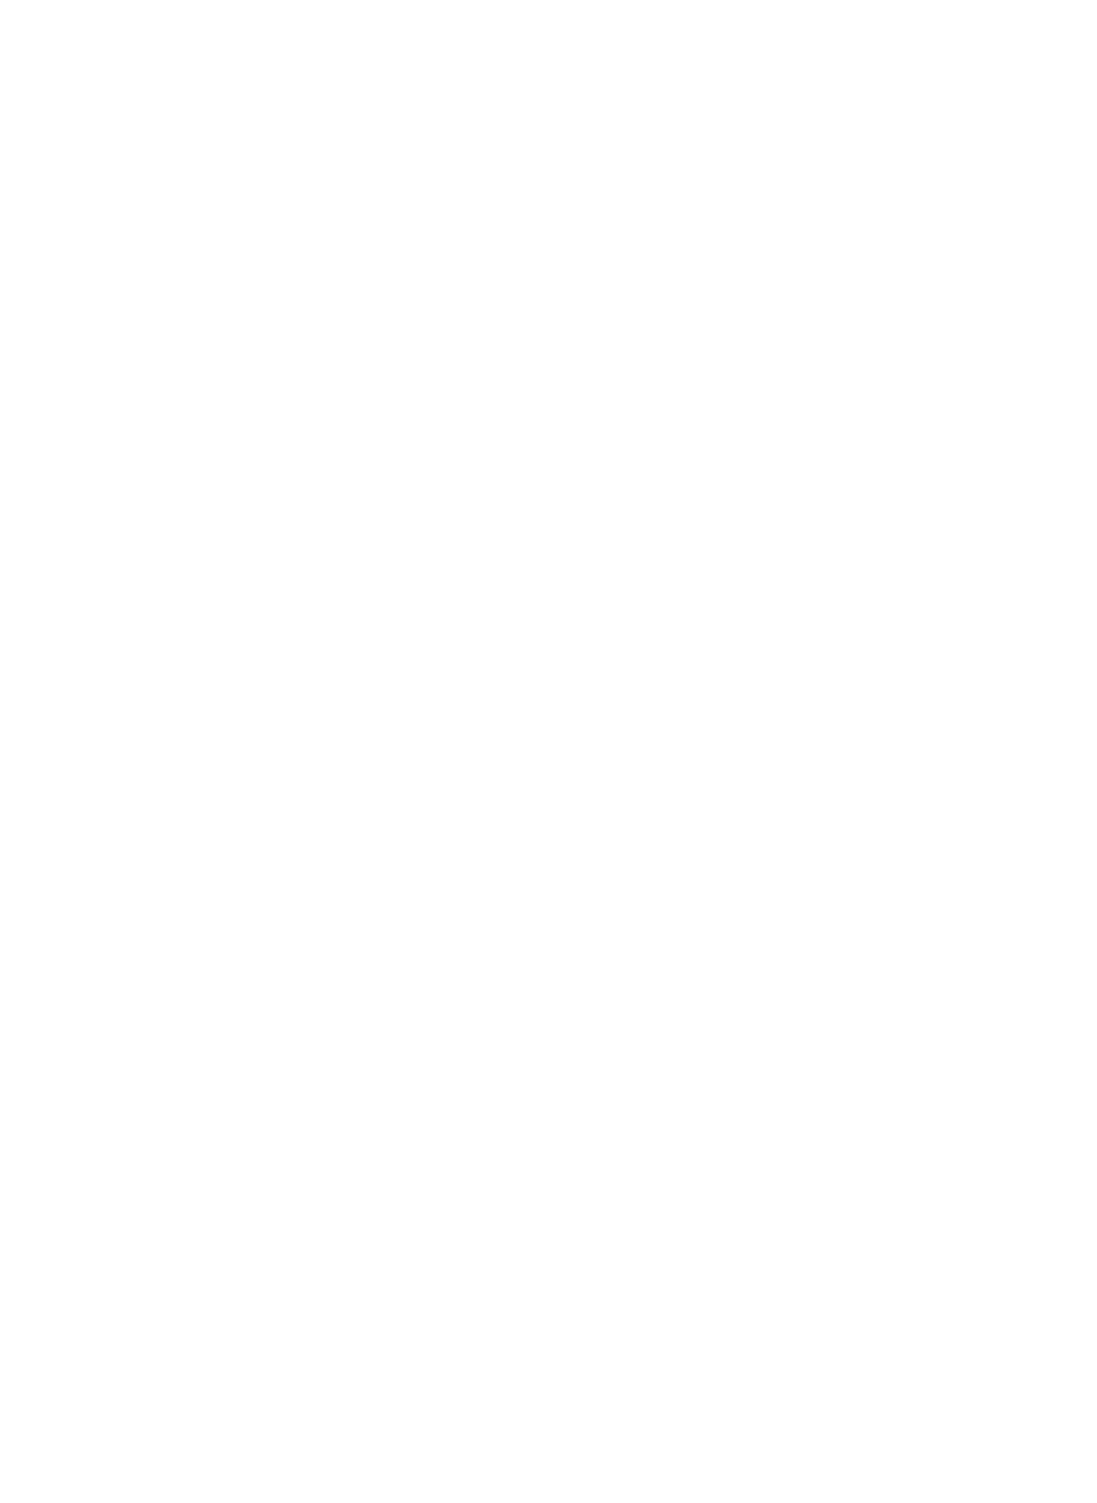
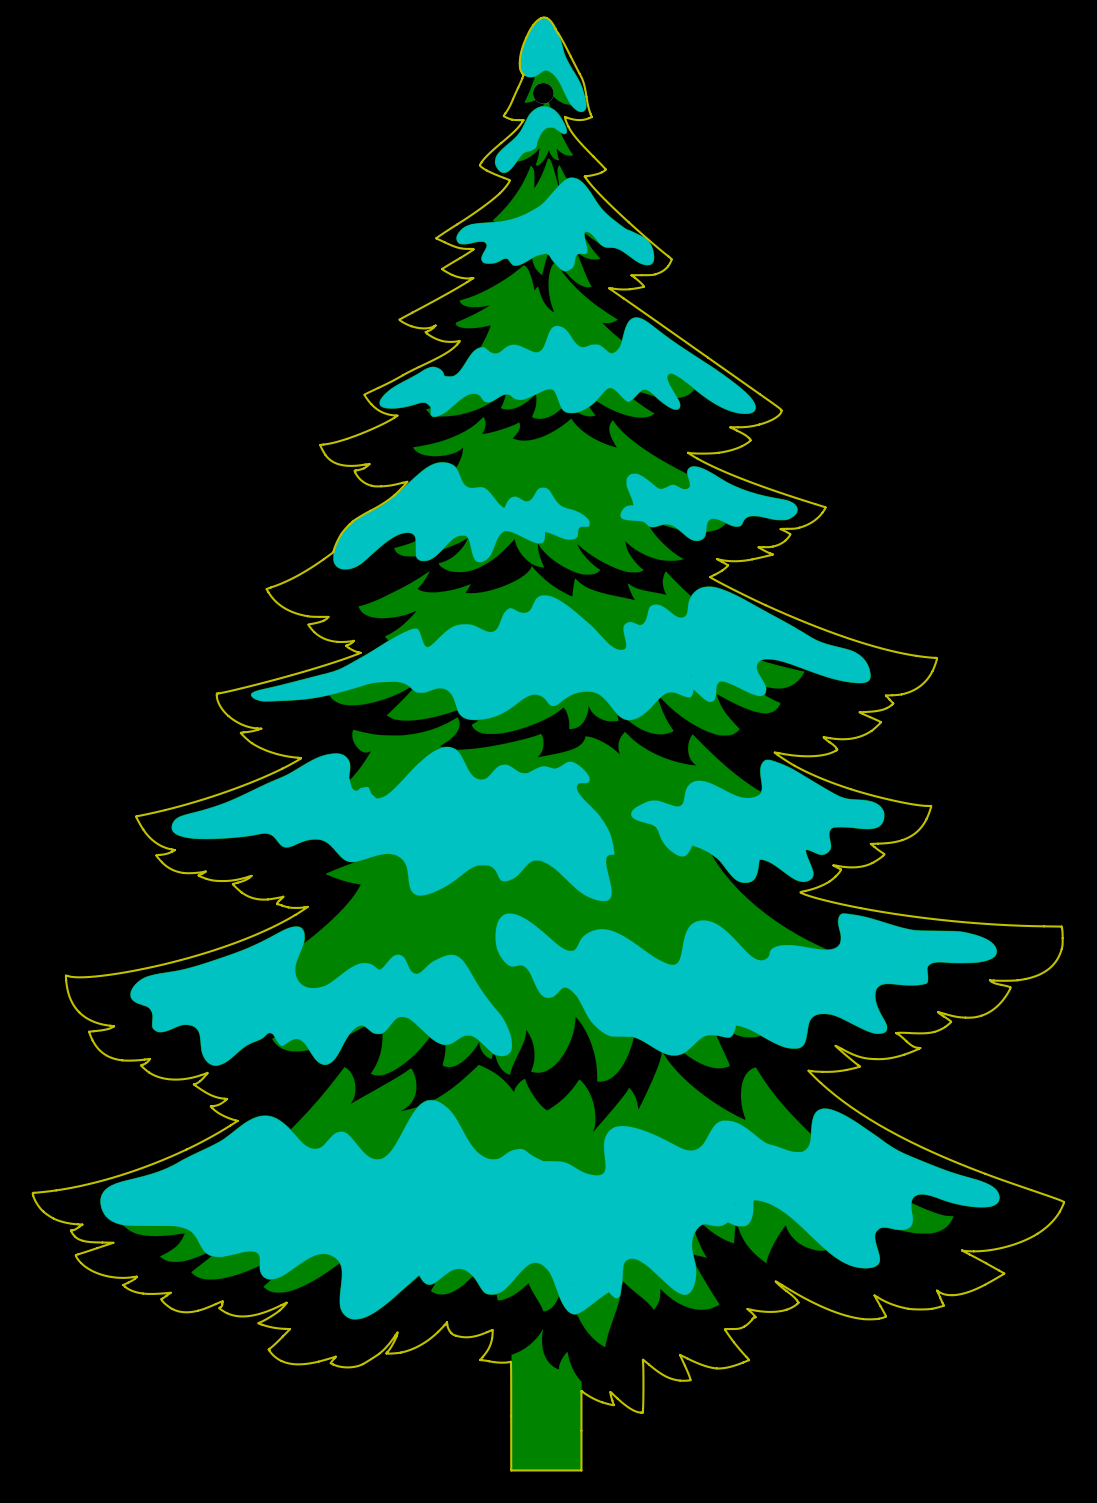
drawing: none -> [100, 17, 1000, 1472]
board edge: none -> (546, 18) (553, 24) (581, 77) (591, 117) (579, 120) (565, 117) (566, 121) (576, 138) (605, 169) (599, 173) (584, 176) (613, 208) (671, 259) (666, 267) (658, 273) (631, 275) (643, 286) (626, 289) (609, 288) (781, 410) (776, 417) (764, 423) (748, 426) (730, 427) (750, 439) (740, 446) (717, 452) (688, 452) (737, 477) (825, 507) (818, 517) (808, 524) (795, 528) (780, 529) (790, 534) (781, 543) (771, 546) (758, 547) (772, 554) (740, 561) (716, 559) (728, 565) (710, 577) (765, 605) (839, 635) (892, 651) (936, 658) (930, 675) (918, 687) (904, 693) (885, 695) (893, 703) (886, 708) (859, 712) (880, 722) (869, 732) (849, 738) (823, 736) (837, 749) (825, 754) (804, 756) (774, 752) (803, 770) (842, 786) (894, 800) (931, 805) (923, 824) (911, 835) (895, 841) (870, 843) (884, 854) (877, 860) (858, 867) (833, 865) (841, 869) (832, 879) (820, 886) (800, 892) (846, 905) (916, 917) (986, 923) (1061, 926) (1062, 943) (1060, 951) (1055, 962) (1047, 970) (1023, 979) (989, 980) (1010, 987) (1001, 1002) (989, 1011) (969, 1017) (938, 1012) (951, 1021) (941, 1029) (927, 1033) (896, 1033) (912, 1045) (920, 1048) (917, 1049) (894, 1057) (873, 1059) (857, 1056) (835, 1045) (859, 1066) (835, 1071) (808, 1070) (851, 1107) (899, 1136) (958, 1163) (1063, 1202) (1058, 1213) (1050, 1223) (1027, 1239) (994, 1249) (961, 1250) (1004, 1273) (980, 1287) (962, 1293) (948, 1294) (936, 1290) (943, 1305) (939, 1307) (927, 1309) (908, 1308) (889, 1303) (874, 1295) (886, 1316) (875, 1319) (858, 1318) (821, 1306) (775, 1281) (798, 1302) (790, 1308) (779, 1311) (747, 1309) (755, 1317) (741, 1327) (724, 1329) (749, 1360) (730, 1366) (716, 1368) (702, 1364) (680, 1354) (690, 1379) (682, 1380) (665, 1376) (643, 1359) (642, 1412) (629, 1408) (610, 1392) (613, 1405) (597, 1400) (581, 1391) (581, 1470) (511, 1470) (510, 1361) (480, 1359) (490, 1345) (492, 1329) (474, 1336) (461, 1336) (451, 1333) (446, 1322) (433, 1335) (417, 1346) (401, 1352) (386, 1353) (397, 1332) (381, 1352) (357, 1366) (344, 1367) (330, 1363) (335, 1356) (307, 1363) (286, 1362) (276, 1357) (268, 1349) (290, 1329) (273, 1327) (258, 1323) (277, 1312) (286, 1302) (264, 1312) (247, 1316) (234, 1315) (223, 1311) (219, 1308) (222, 1301) (194, 1311) (184, 1312) (173, 1309) (161, 1299) (170, 1292) (149, 1293) (135, 1291) (123, 1285) (137, 1276) (107, 1276) (94, 1271) (83, 1265) (76, 1255) (113, 1242) (87, 1241) (77, 1238) (70, 1230) (82, 1224) (64, 1222) (50, 1216) (39, 1207) (32, 1193) (87, 1184) (137, 1169) (189, 1148) (237, 1120) (220, 1114) (210, 1106) (218, 1104) (227, 1098) (211, 1095) (193, 1084) (200, 1080) (207, 1072) (183, 1079) (162, 1078) (151, 1073) (141, 1065) (149, 1059) (119, 1059) (101, 1051) (93, 1042) (89, 1031) (114, 1026) (92, 1021) (78, 1010) (69, 996) (65, 975) (83, 977) (110, 974) (189, 957) (258, 933) (307, 906) (290, 907) (277, 904) (283, 896) (265, 899) (252, 897) (243, 893) (232, 884) (251, 875) (233, 880) (215, 880) (198, 875) (205, 871) (185, 873) (171, 869) (156, 855) (174, 850) (163, 847) (152, 840) (143, 829) (136, 816) (180, 806) (227, 791) (270, 774) (300, 758) (273, 752) (250, 742) (240, 732) (261, 728) (244, 725) (230, 717) (220, 705) (216, 693) (297, 673) (360, 652) (346, 645) (353, 640) (339, 641) (325, 639) (315, 633) (308, 624) (323, 620) (328, 616) (308, 616) (289, 610) (275, 600) (266, 589) (299, 574) (331, 553) (340, 535) (348, 525) (389, 499) (407, 481) (383, 486) (367, 484) (360, 479) (354, 470) (363, 468) (369, 464) (348, 465) (335, 463) (326, 456) (320, 445) (356, 435) (397, 415) (378, 409) (364, 394) (442, 355) (459, 341) (442, 340) (425, 332) (435, 325) (428, 328) (417, 327) (399, 319) (473, 278) (456, 276) (442, 269) (473, 249) (458, 247) (436, 238) (489, 201) (509, 181) (479, 165) (523, 120) (512, 119) (503, 115) (523, 74) (520, 69) (519, 61) (525, 39) (536, 21) (542, 17) (546, 18)
via: none -> (543, 93)

